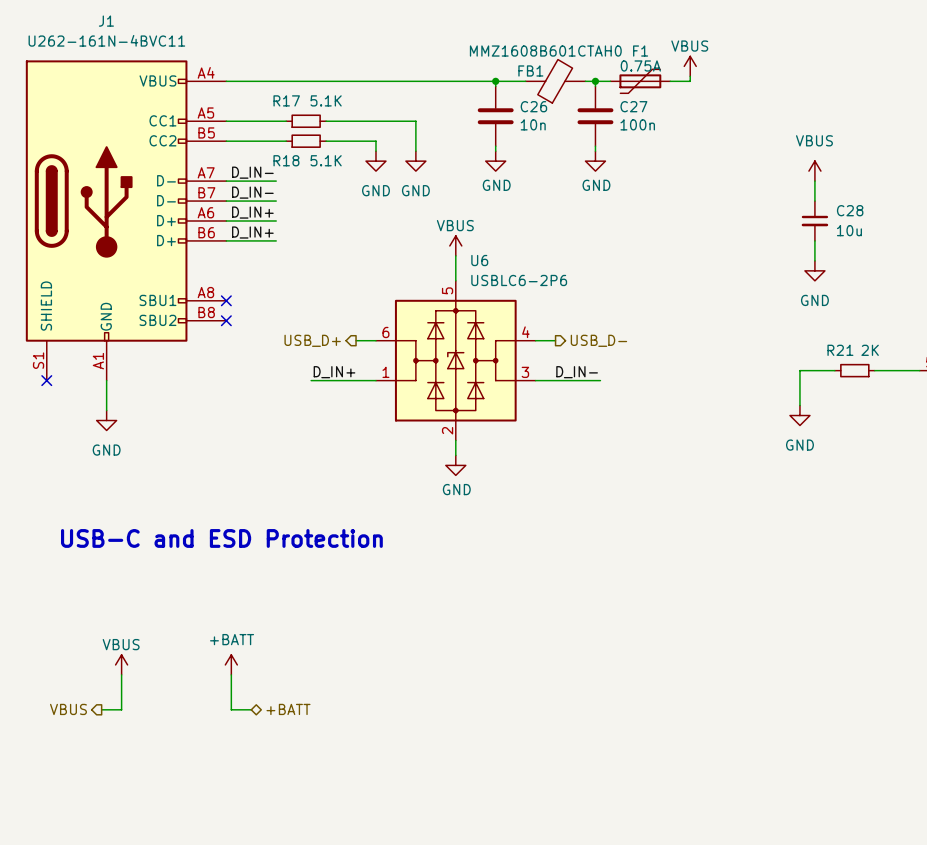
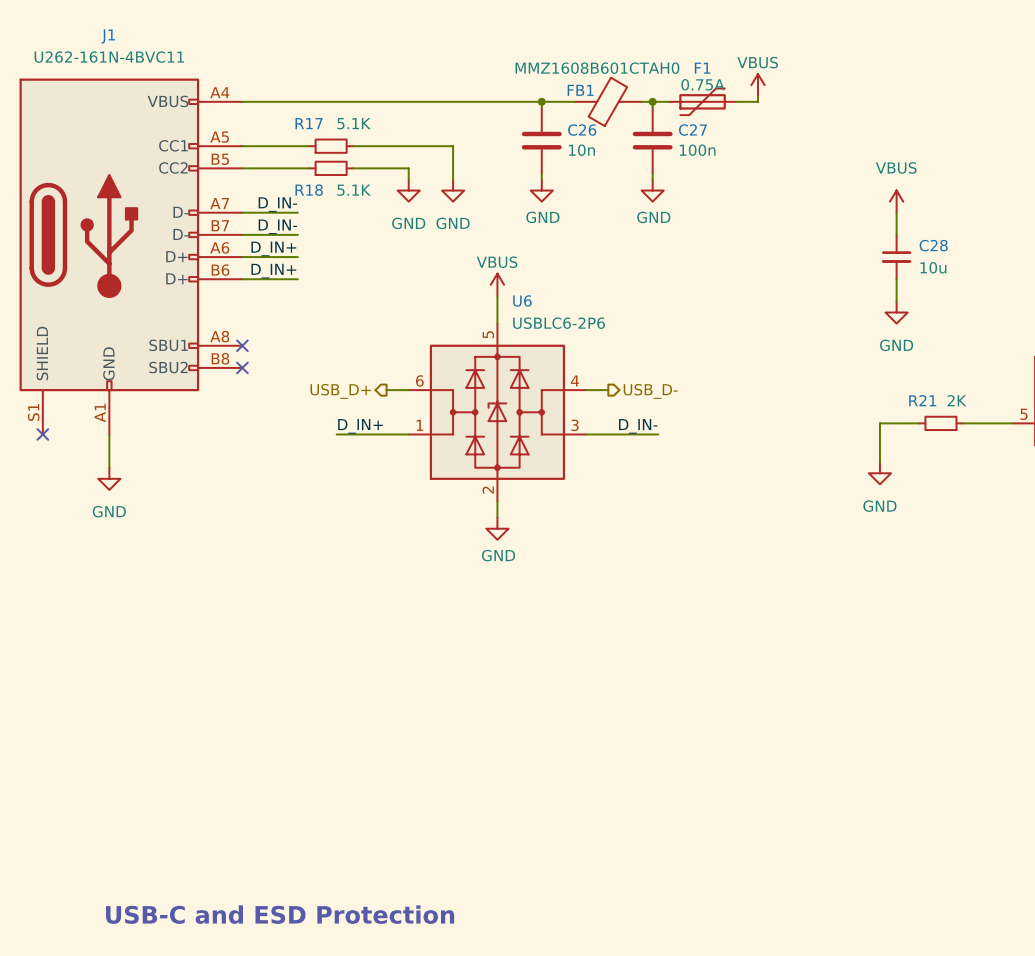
text: USB-C and ESD Protection (221, 538) -> none
power symbol: VBUS (121, 664) -> none
power symbol: +BATT (231, 664) -> none
wire: (121, 674) (121, 709) (101, 709) -> none
wire: (231, 674) (231, 709) (251, 709) -> none
hierarchical label: VBUS (68, 709) -> none
hierarchical label: +BATT (288, 709) -> none
text: none -> USB-C and ESD Protection (280, 914)

